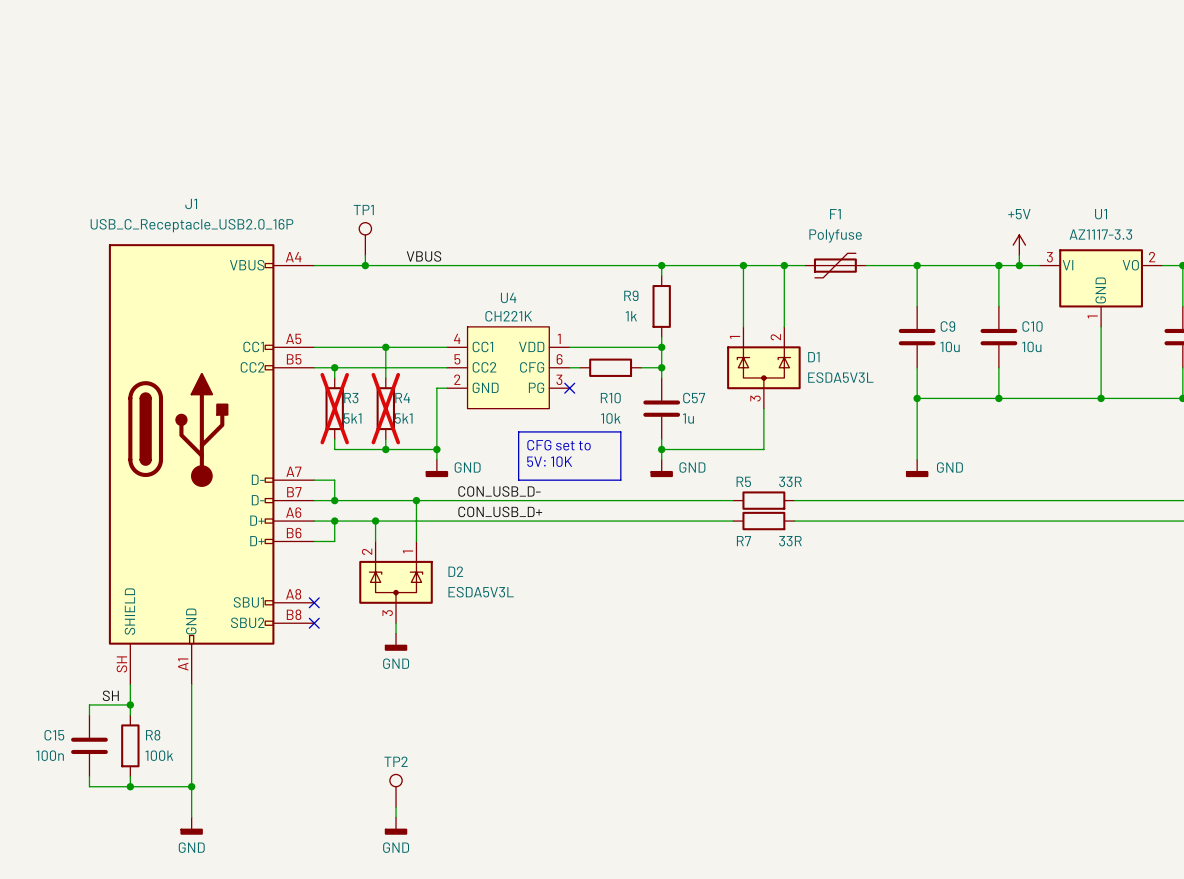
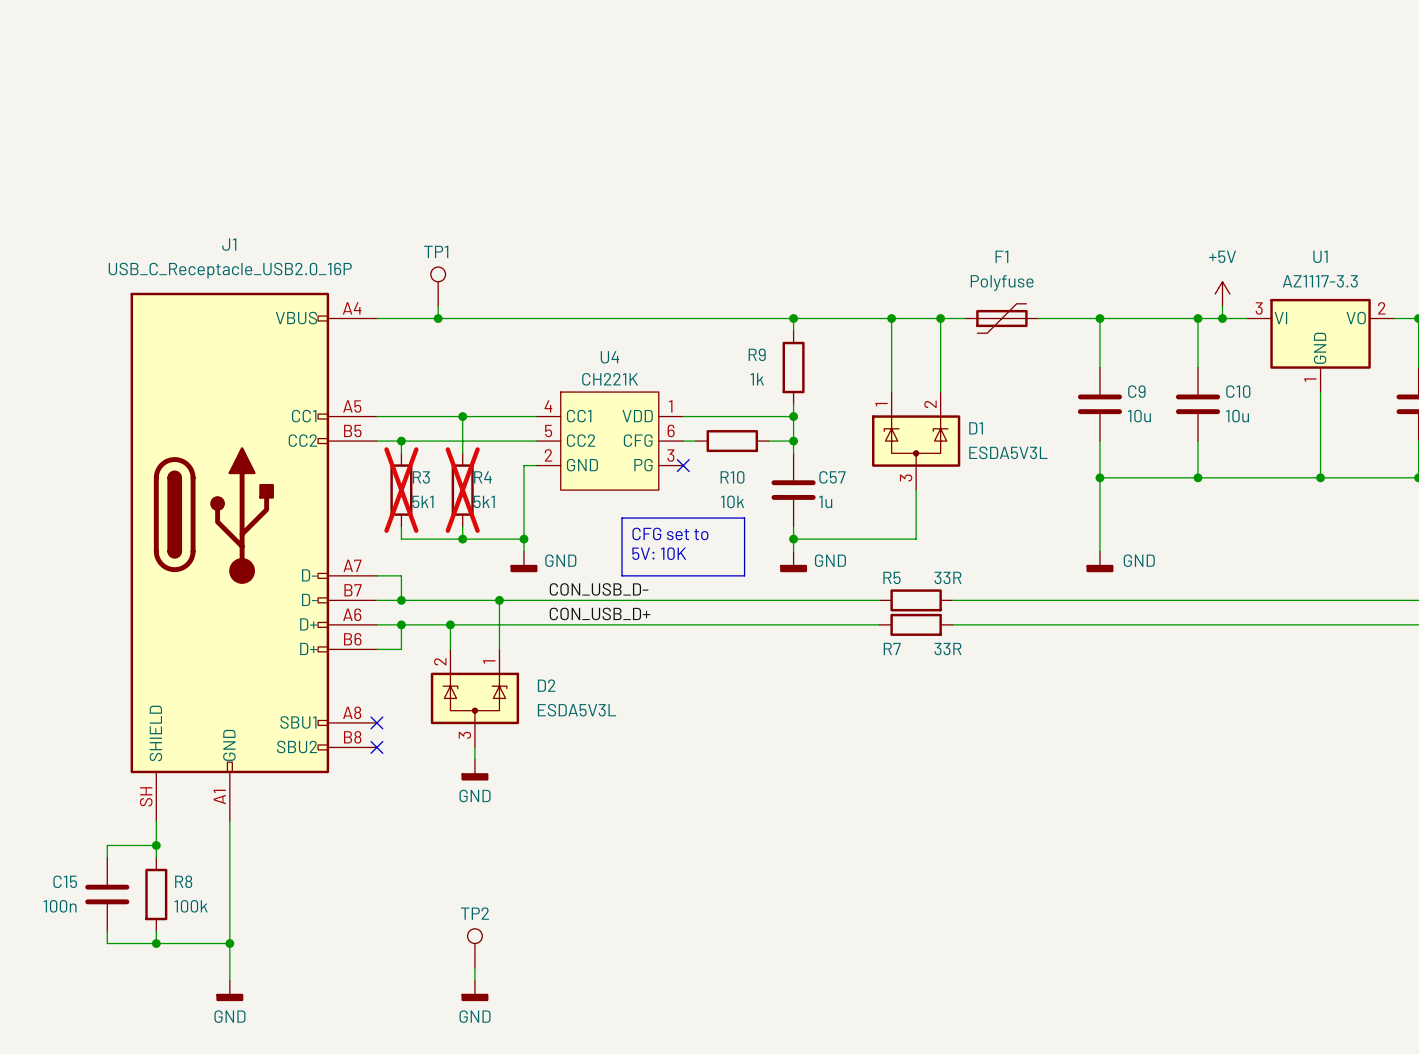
label: VBUS (423, 256) -> none
label: SH (110, 695) -> none

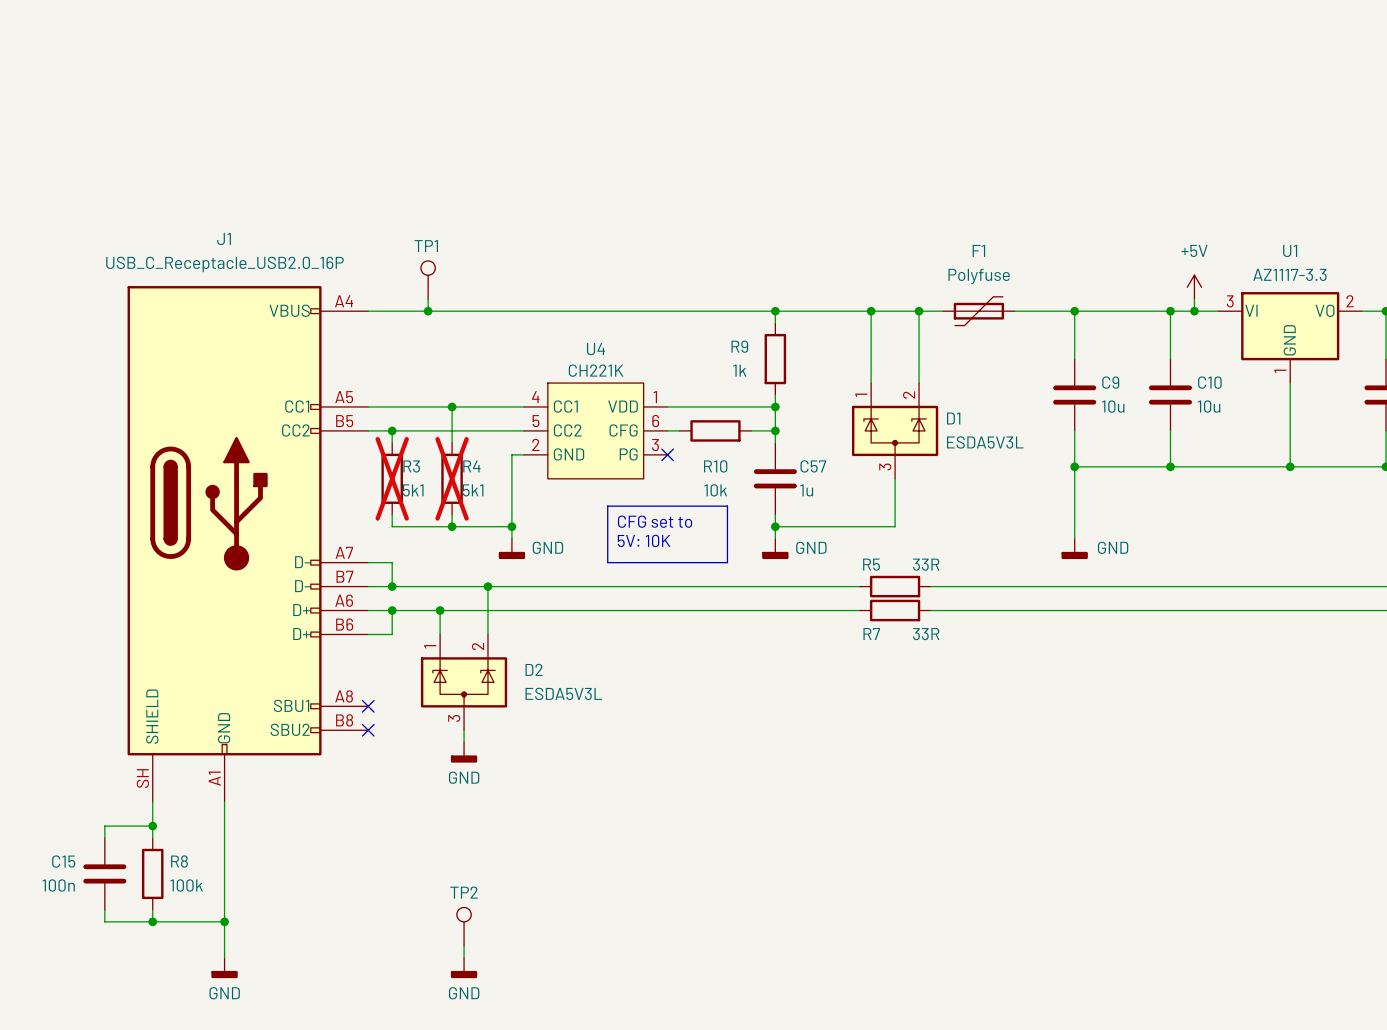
label: CON_USB_D- (599, 589) -> none
label: CON_USB_D+ (599, 613) -> none
D2 flip: as is (474, 698) -> left-right (464, 682)

